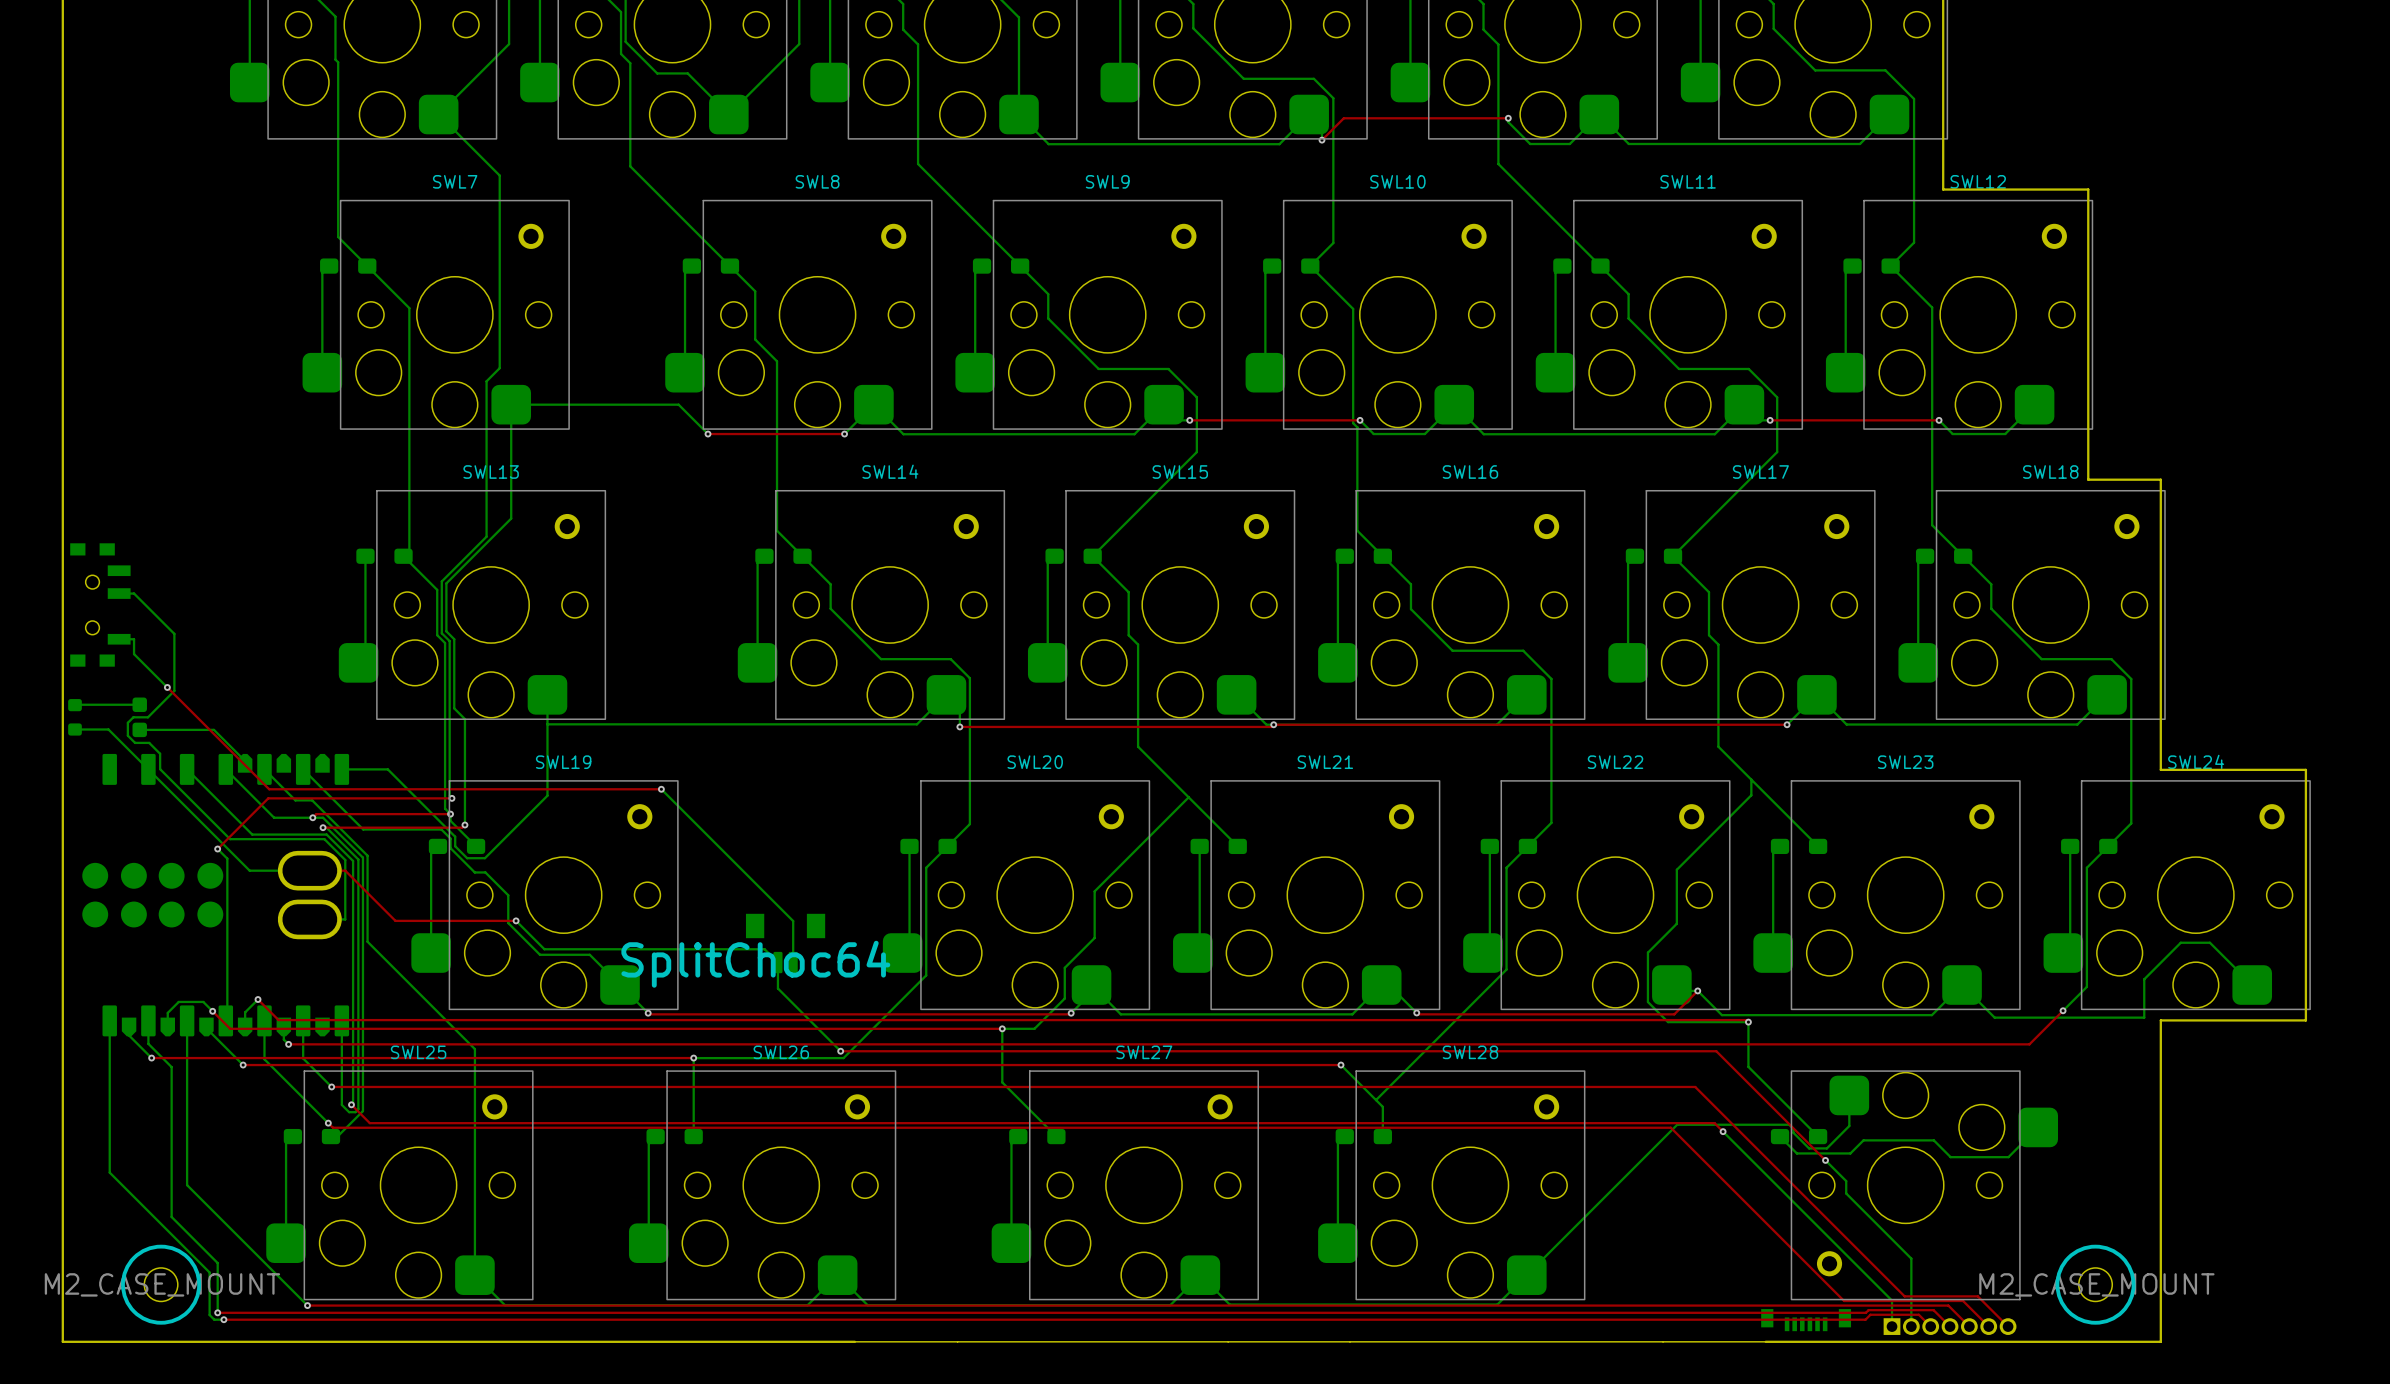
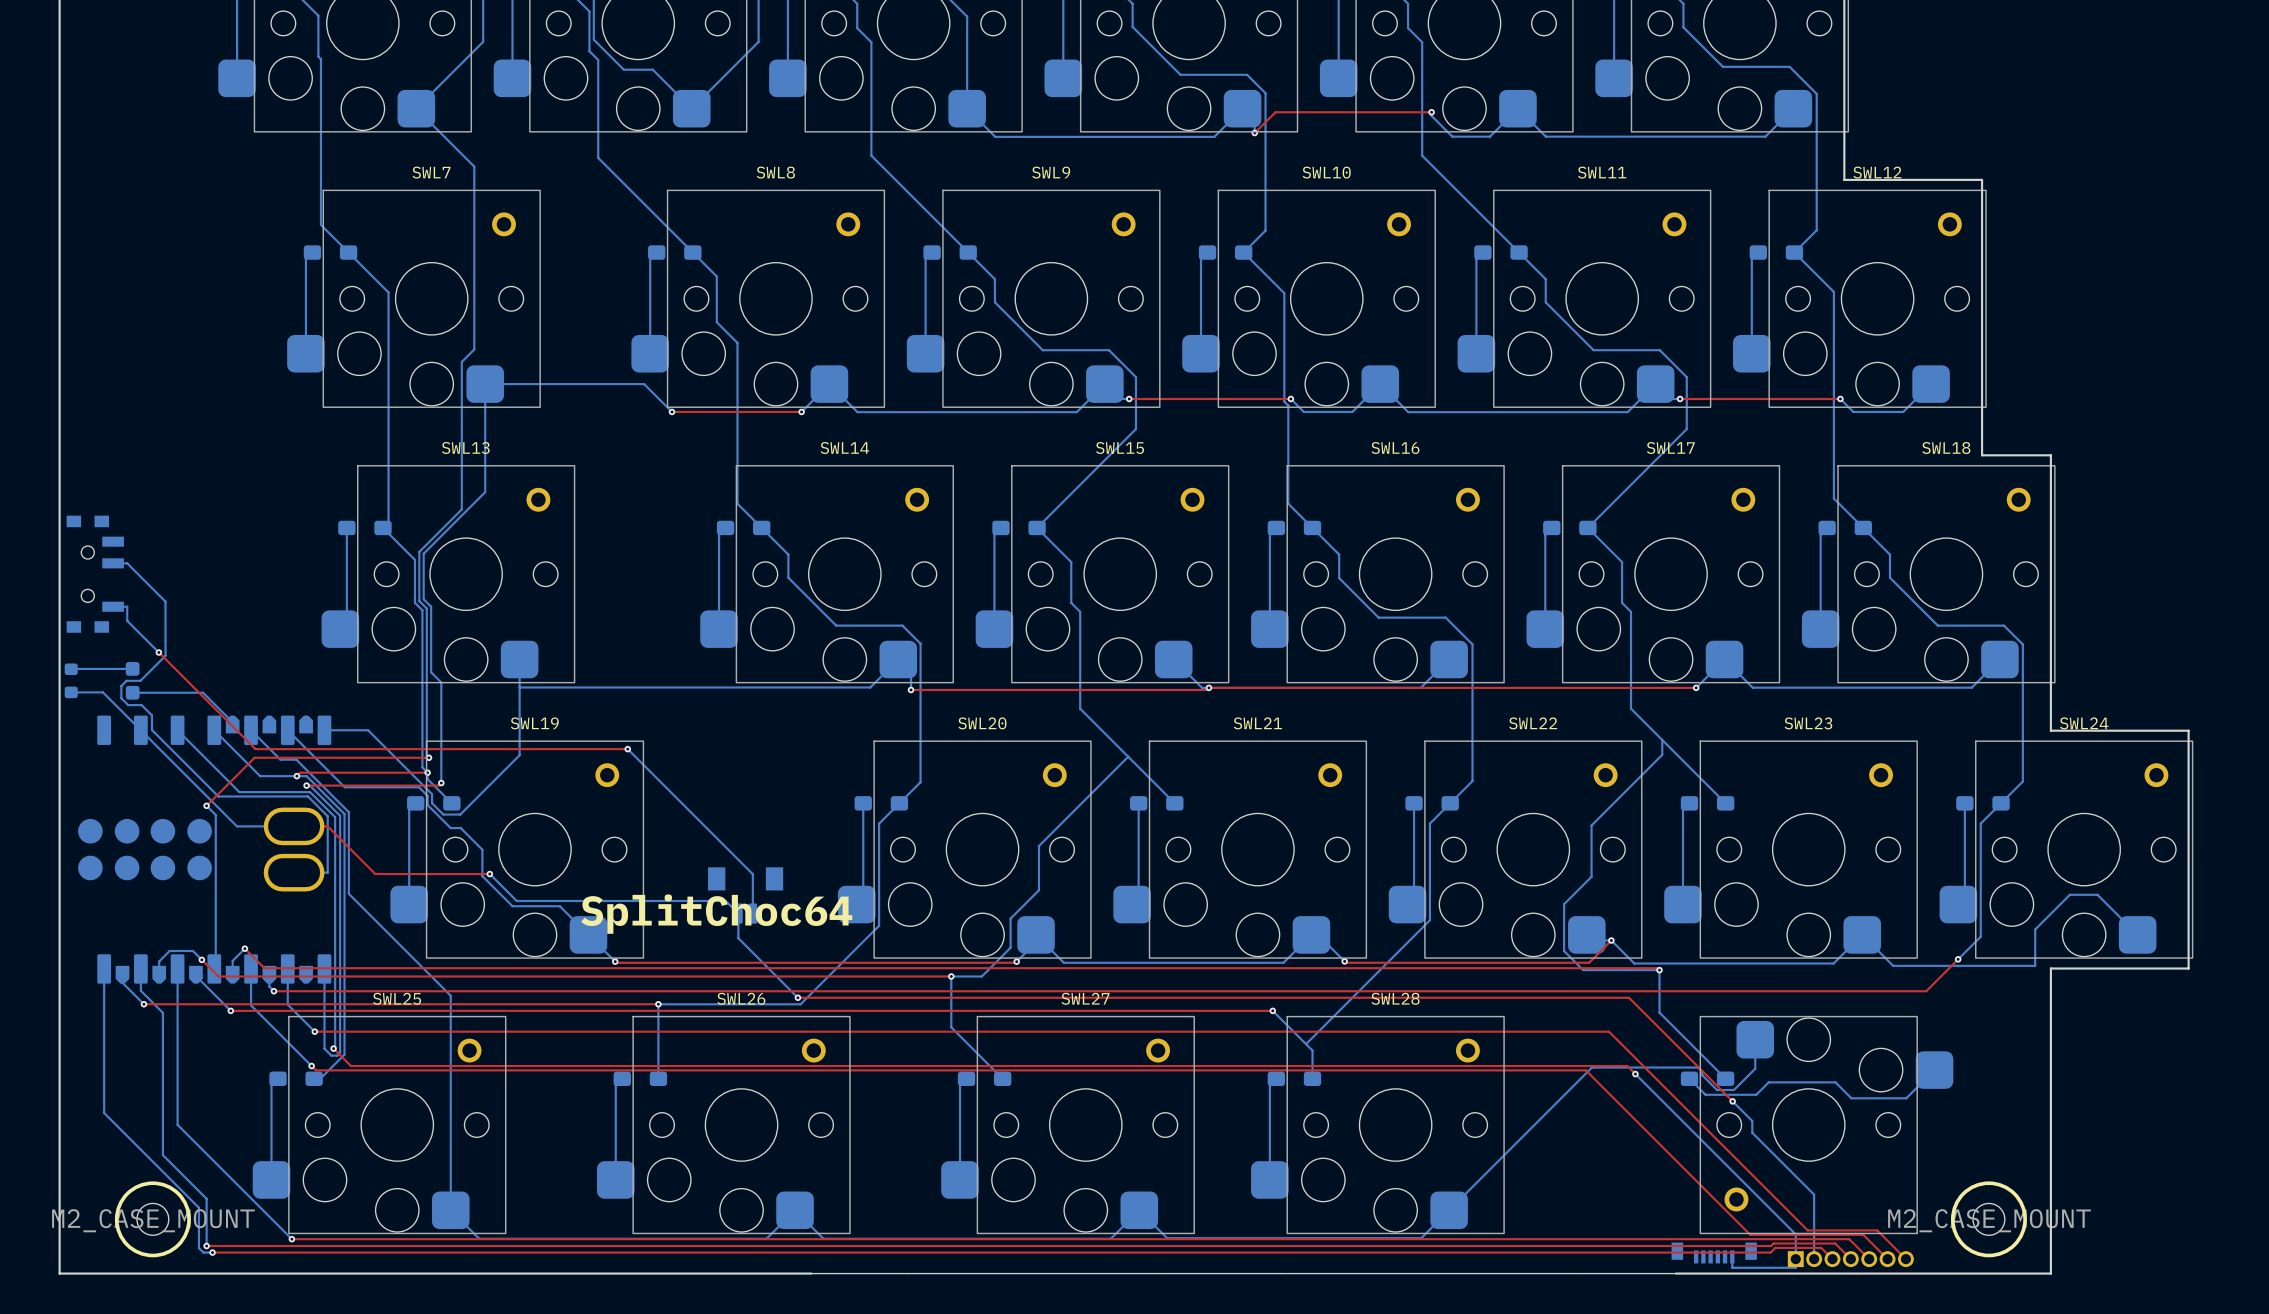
bottom track: none -> (1732, 1256) (1732, 1267) (1795, 1267) (1795, 1259)

